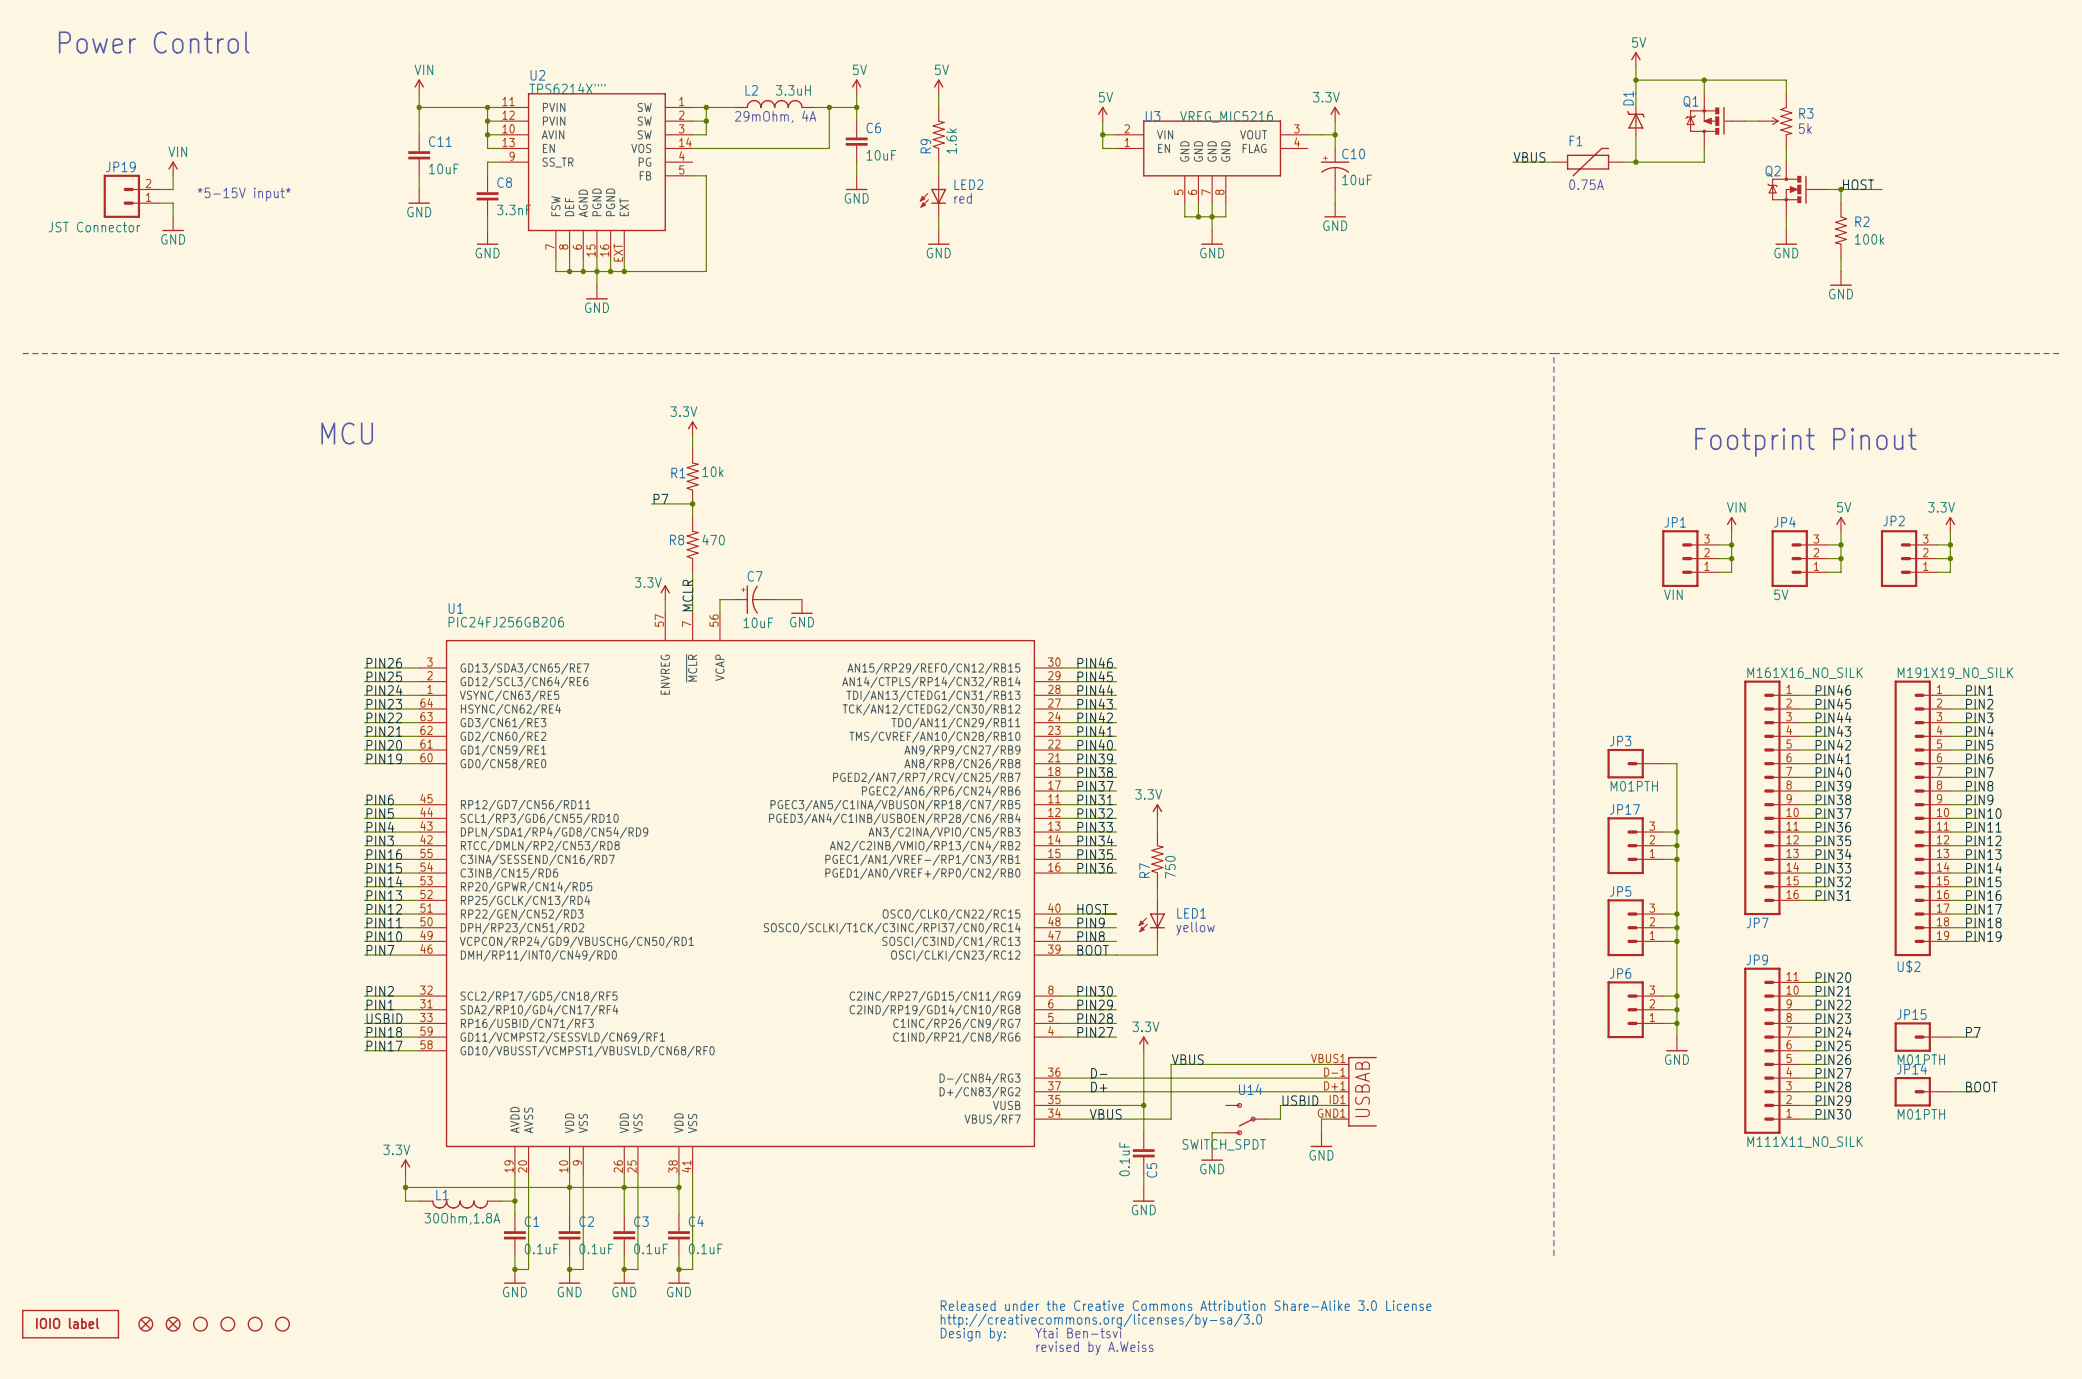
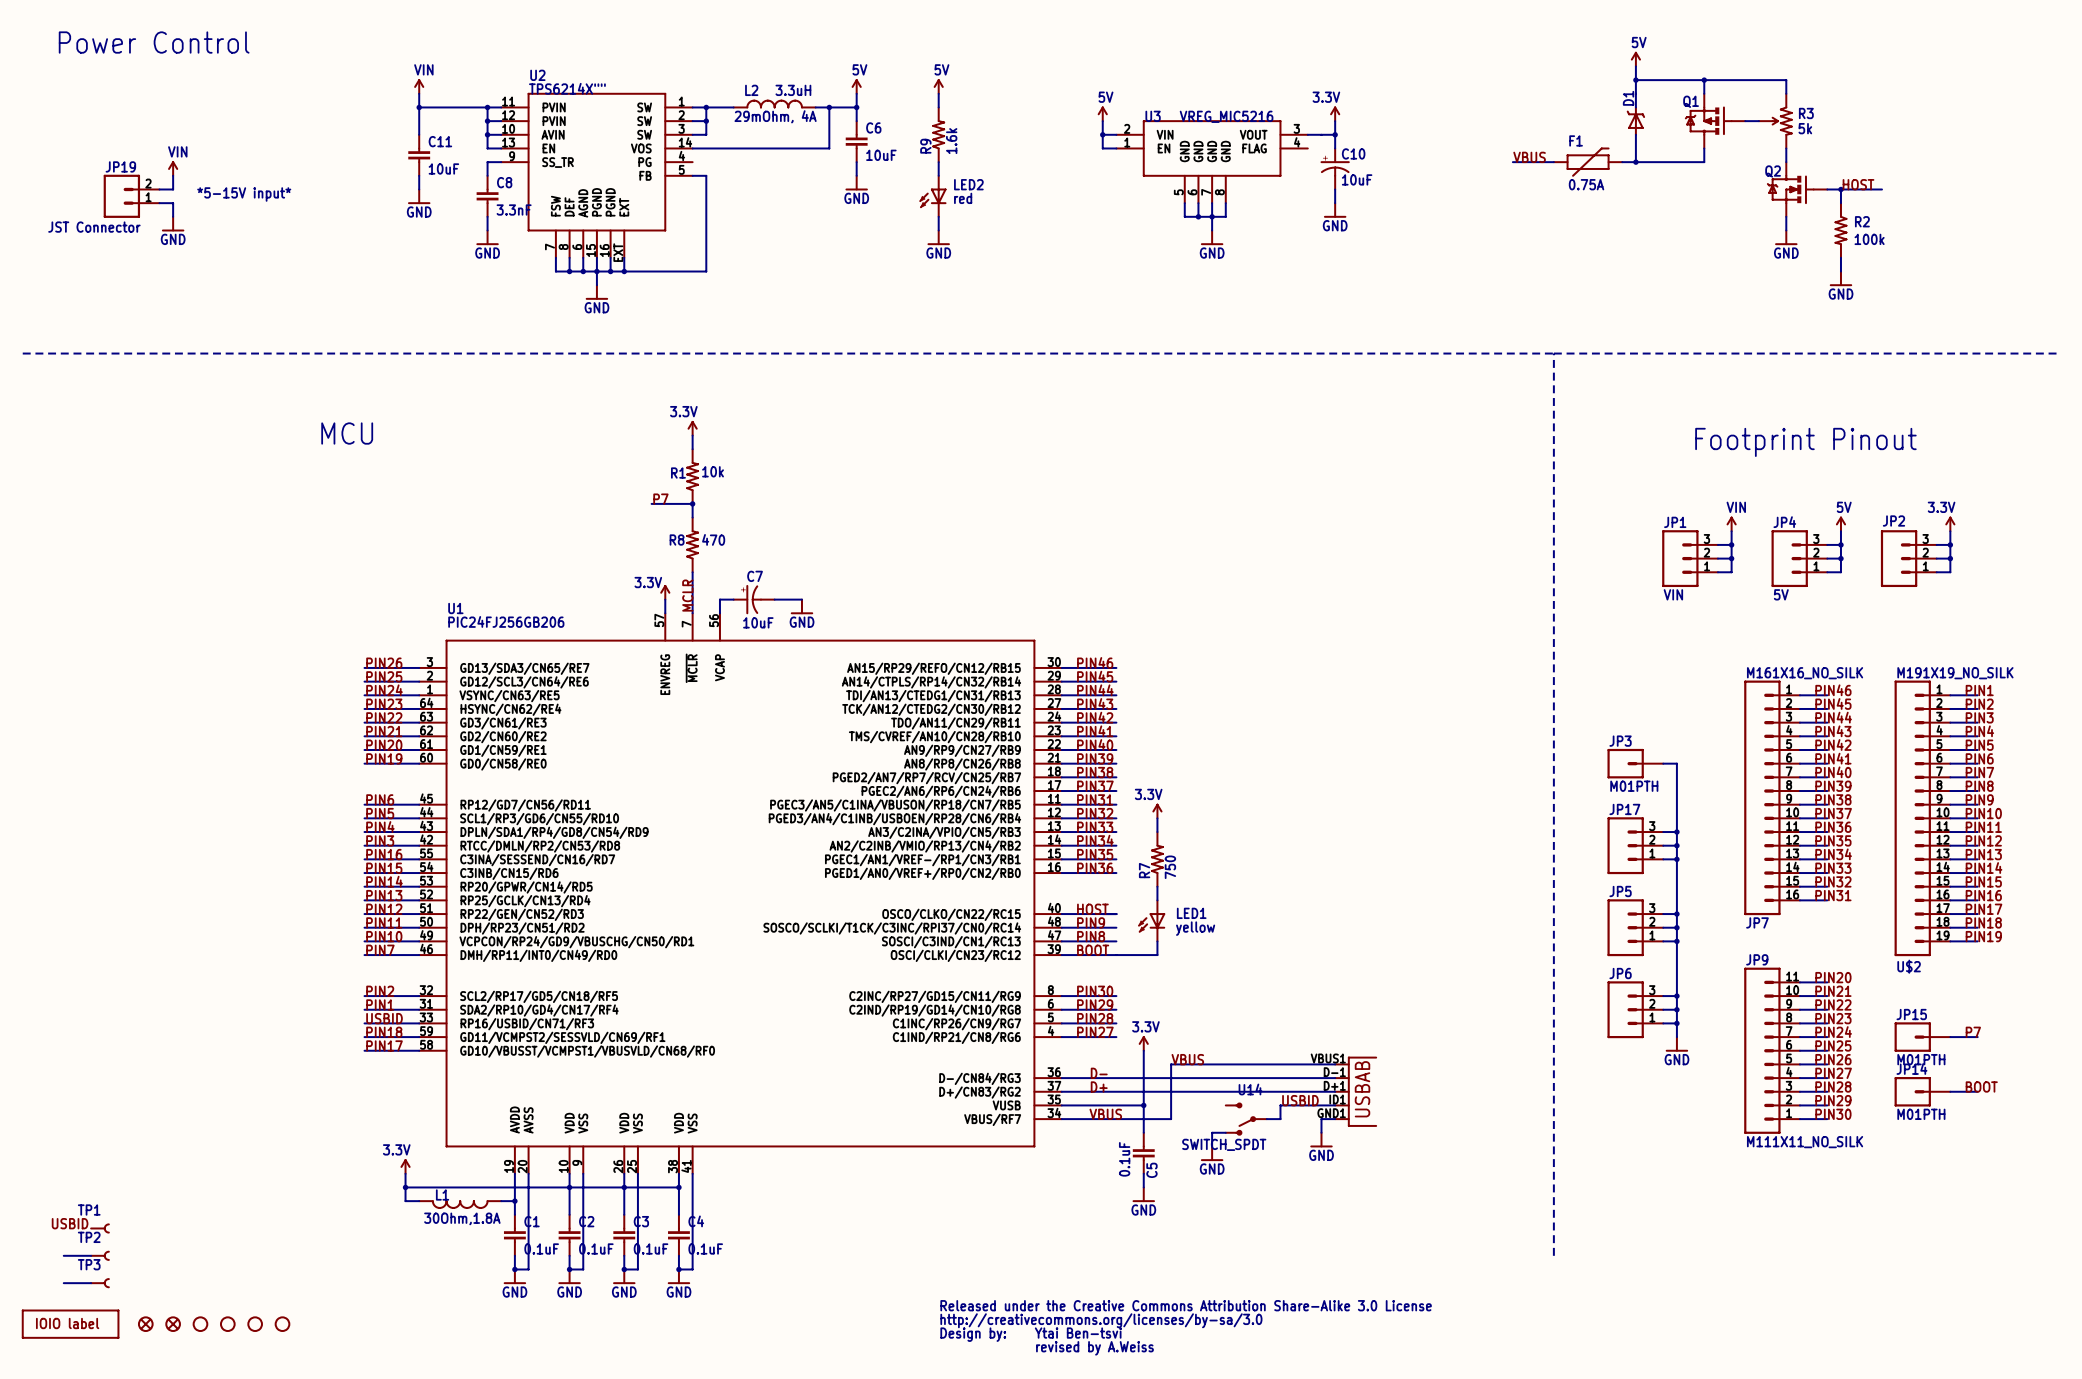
label: none -> USBID (70, 1223)
TP1: none -> (99, 1228)
wire: none -> (63, 1255) (91, 1255)
TP2: none -> (99, 1255)
wire: none -> (63, 1283) (91, 1283)
TP3: none -> (99, 1283)

